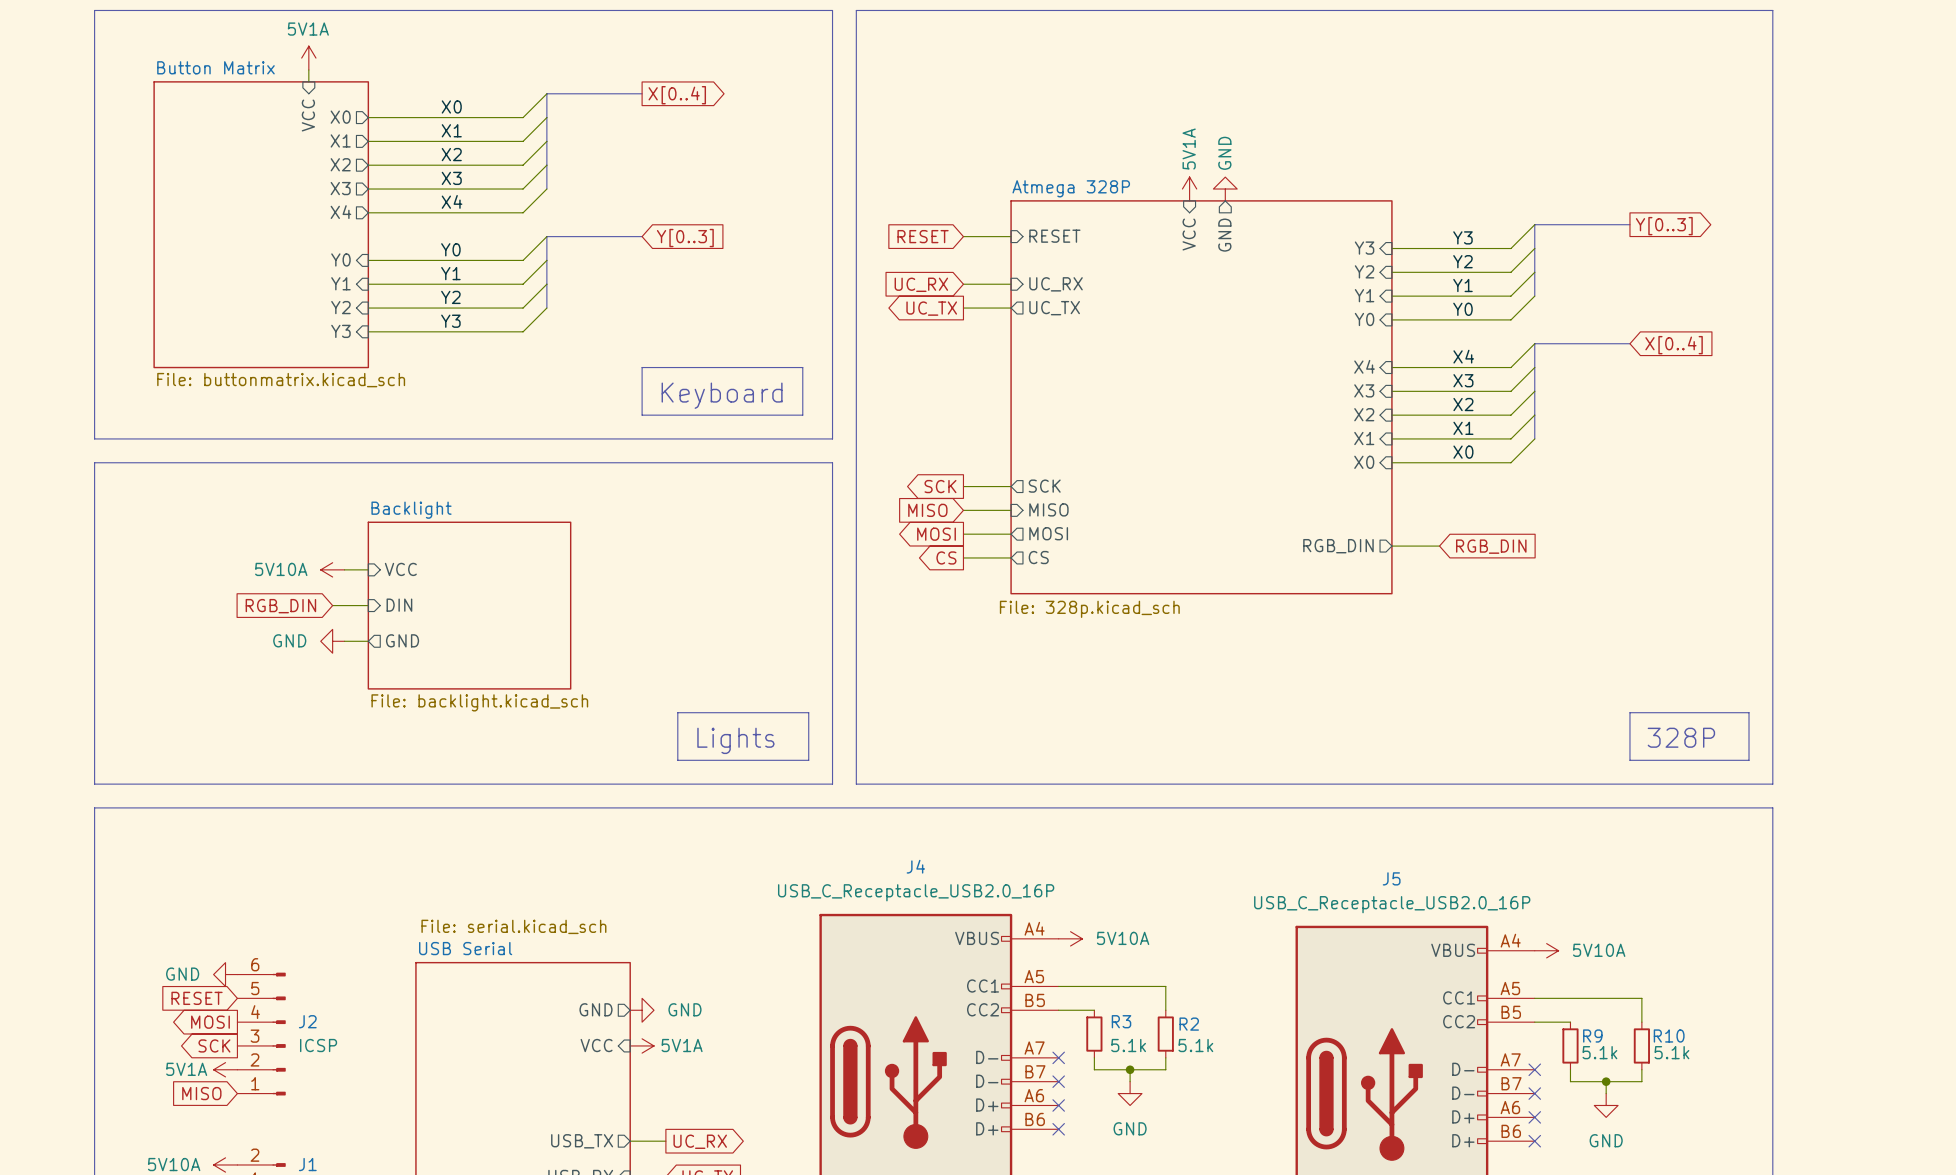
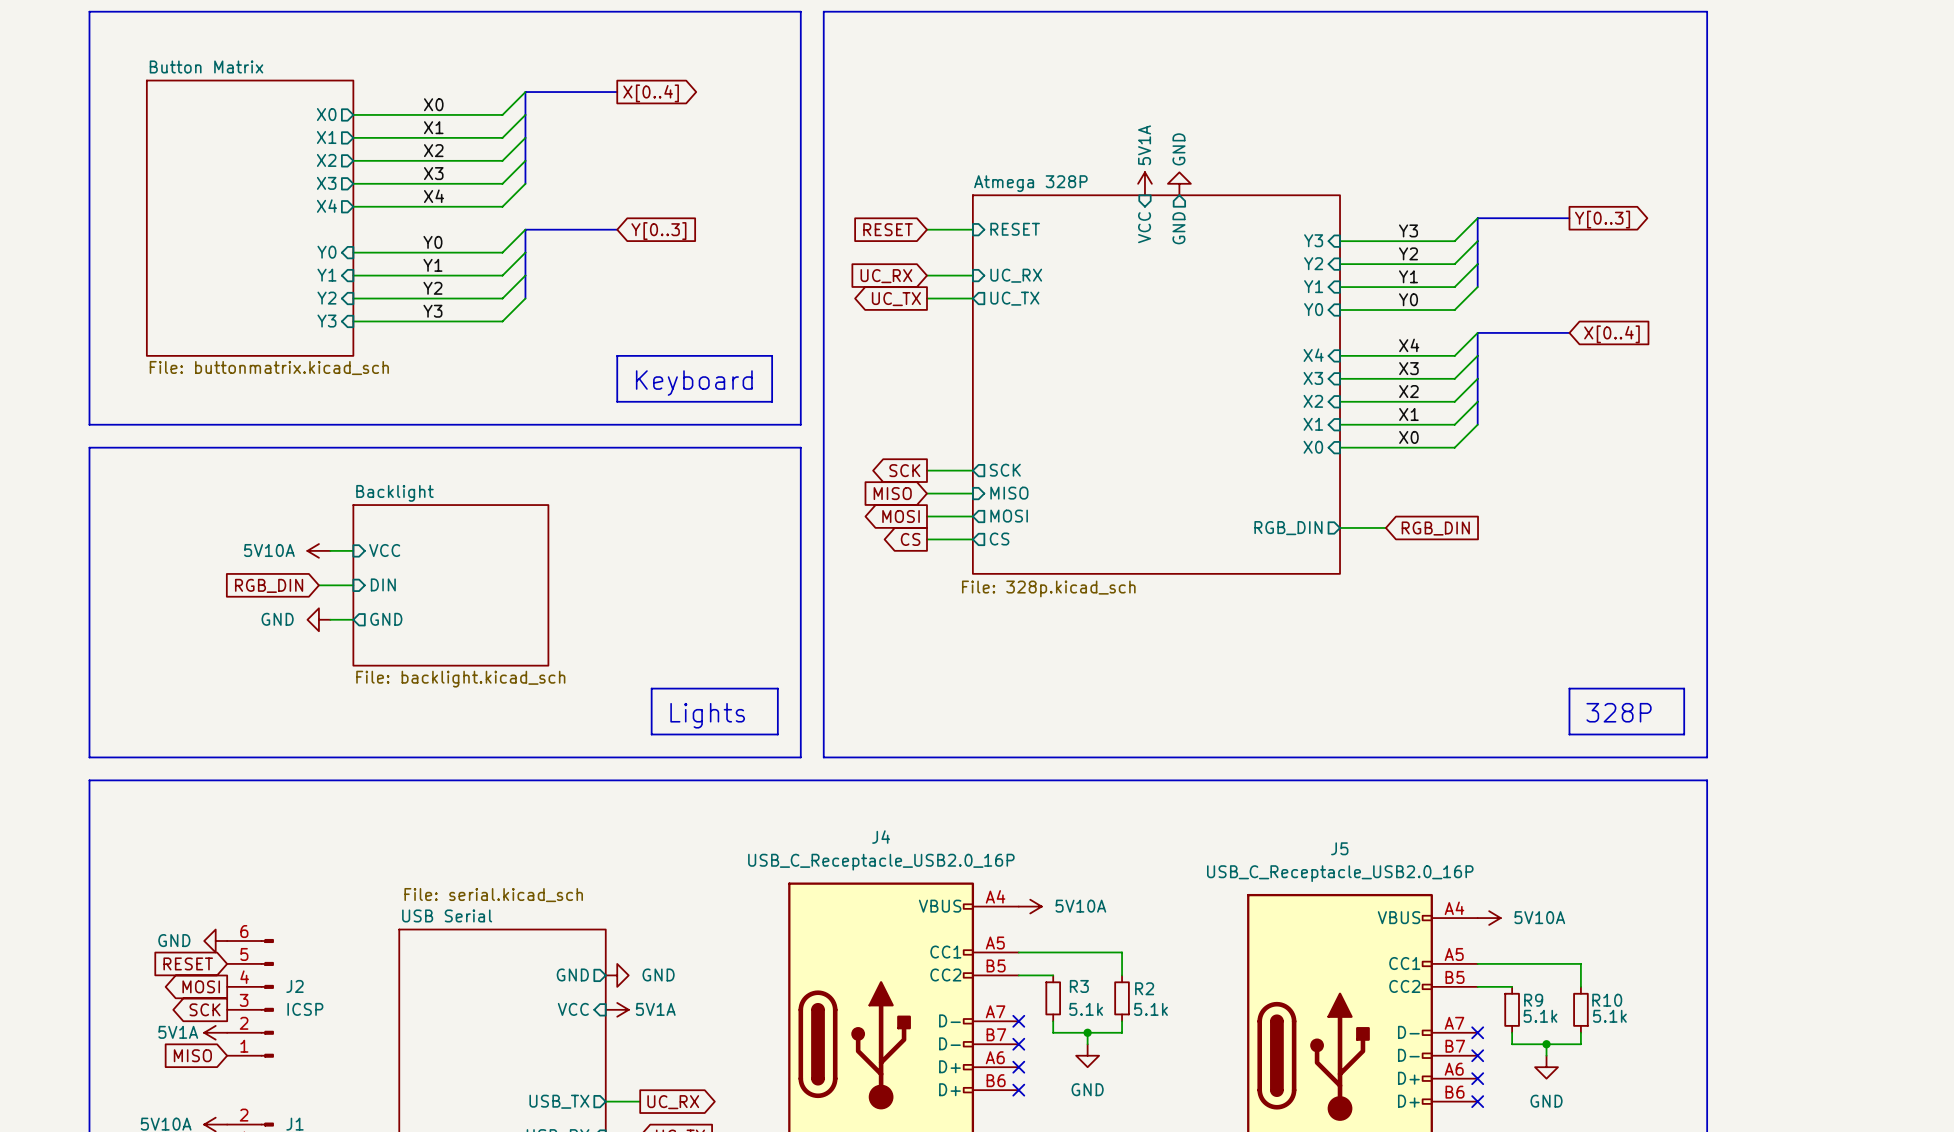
power symbol: 5V1A (308, 58) -> none
wire: (308, 69) (308, 81) -> none
sheet pin: VCC (308, 115) -> none

